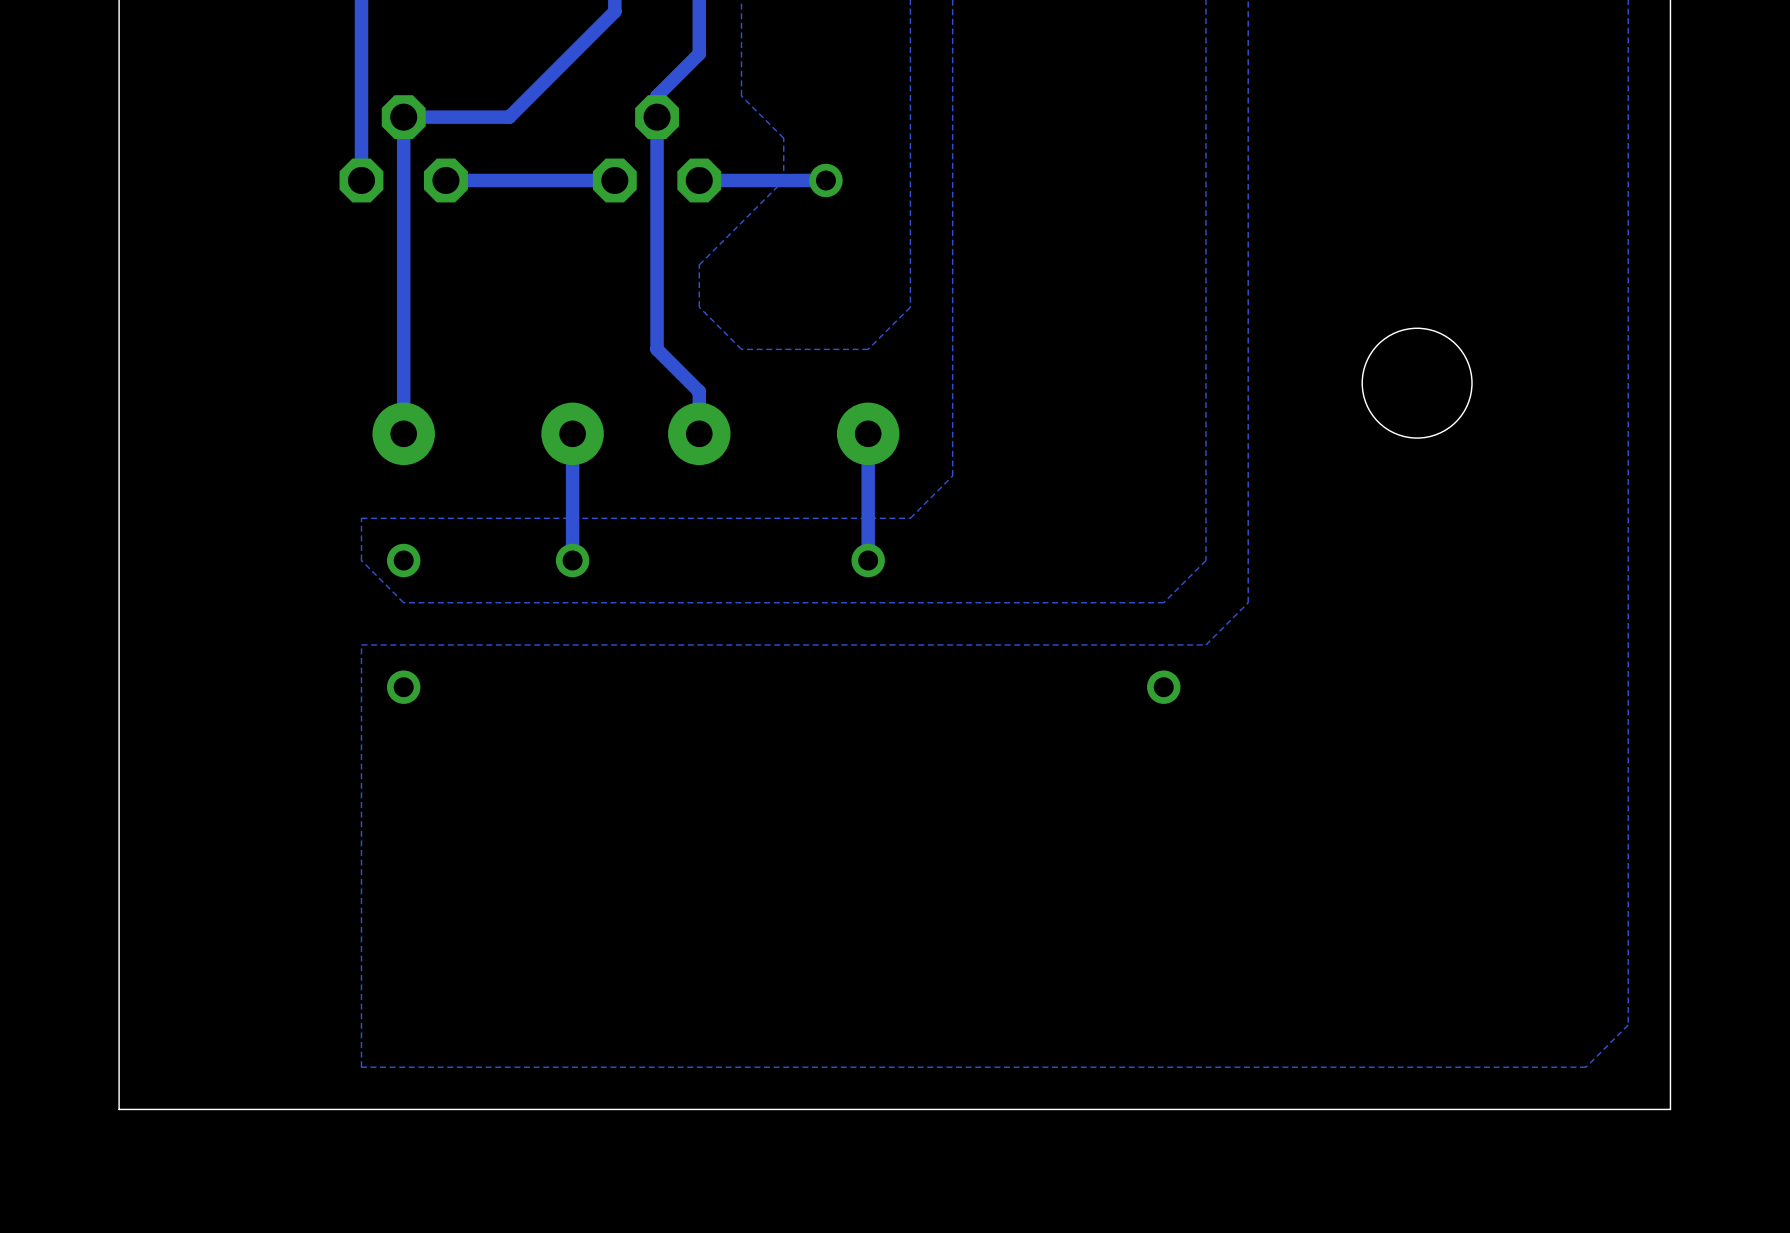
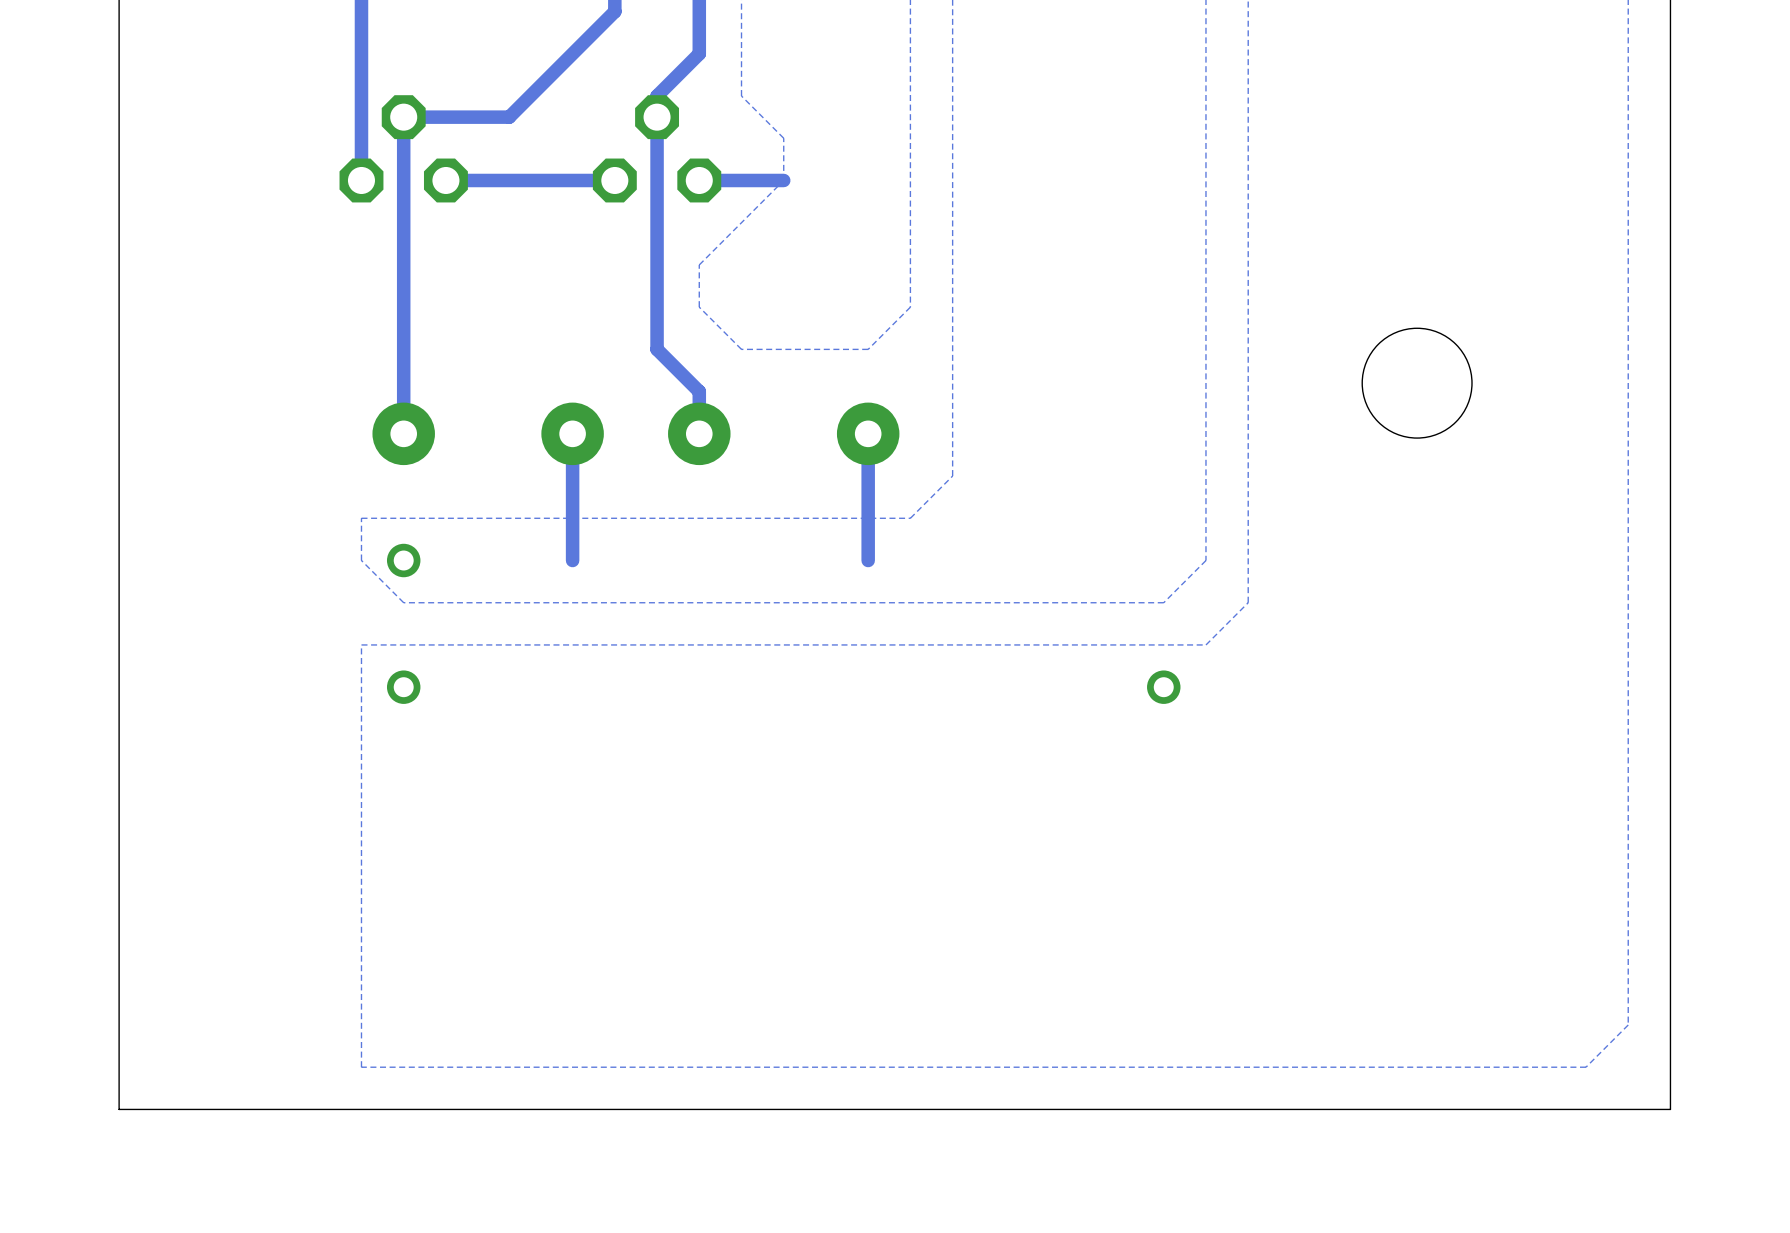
track: (825, 180) (783, 180) -> none
via: (825, 180) -> none
via: (572, 560) -> none
via: (868, 560) -> none

